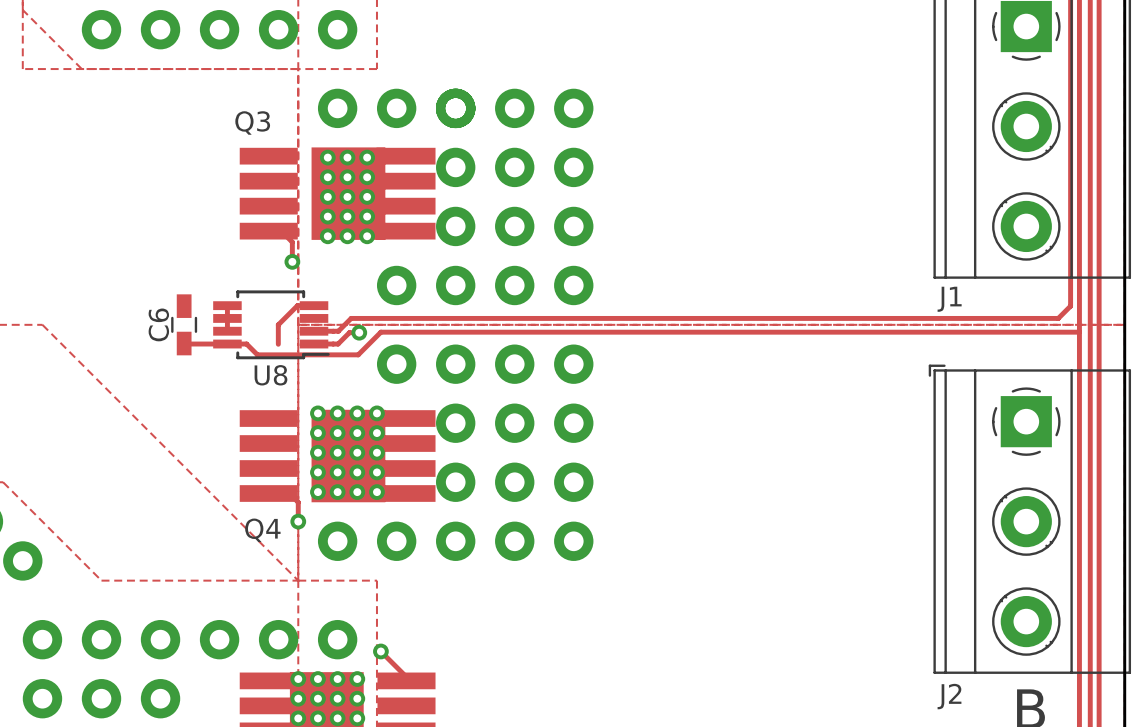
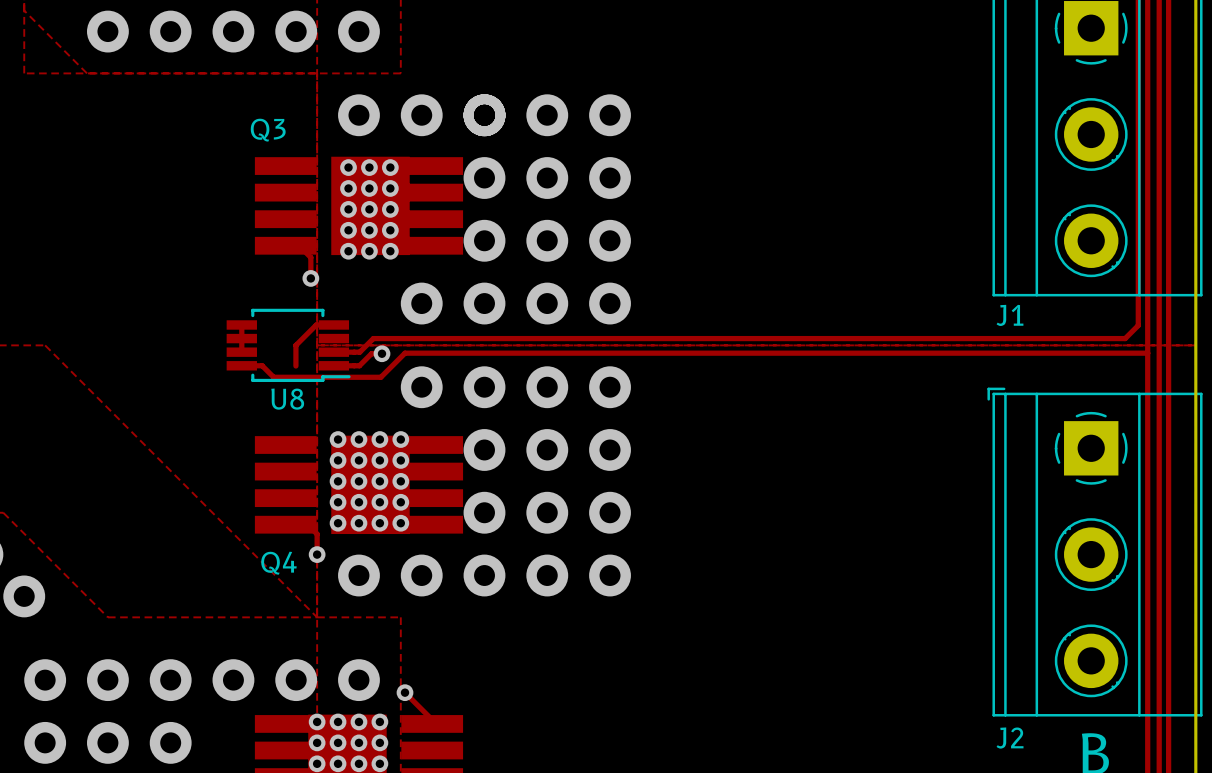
C6: (184, 324) -> none
track: (184, 343) (227, 344) -> none

